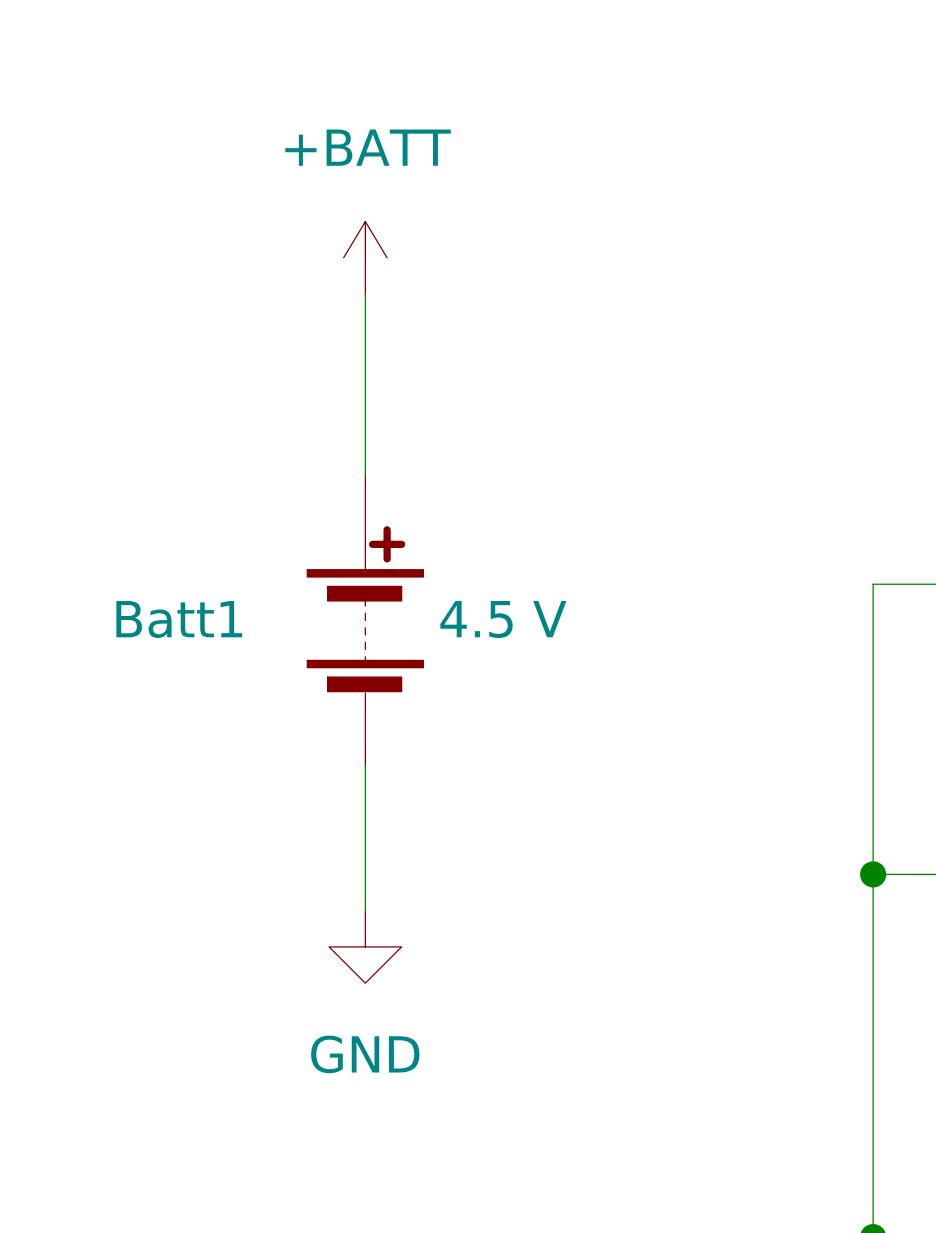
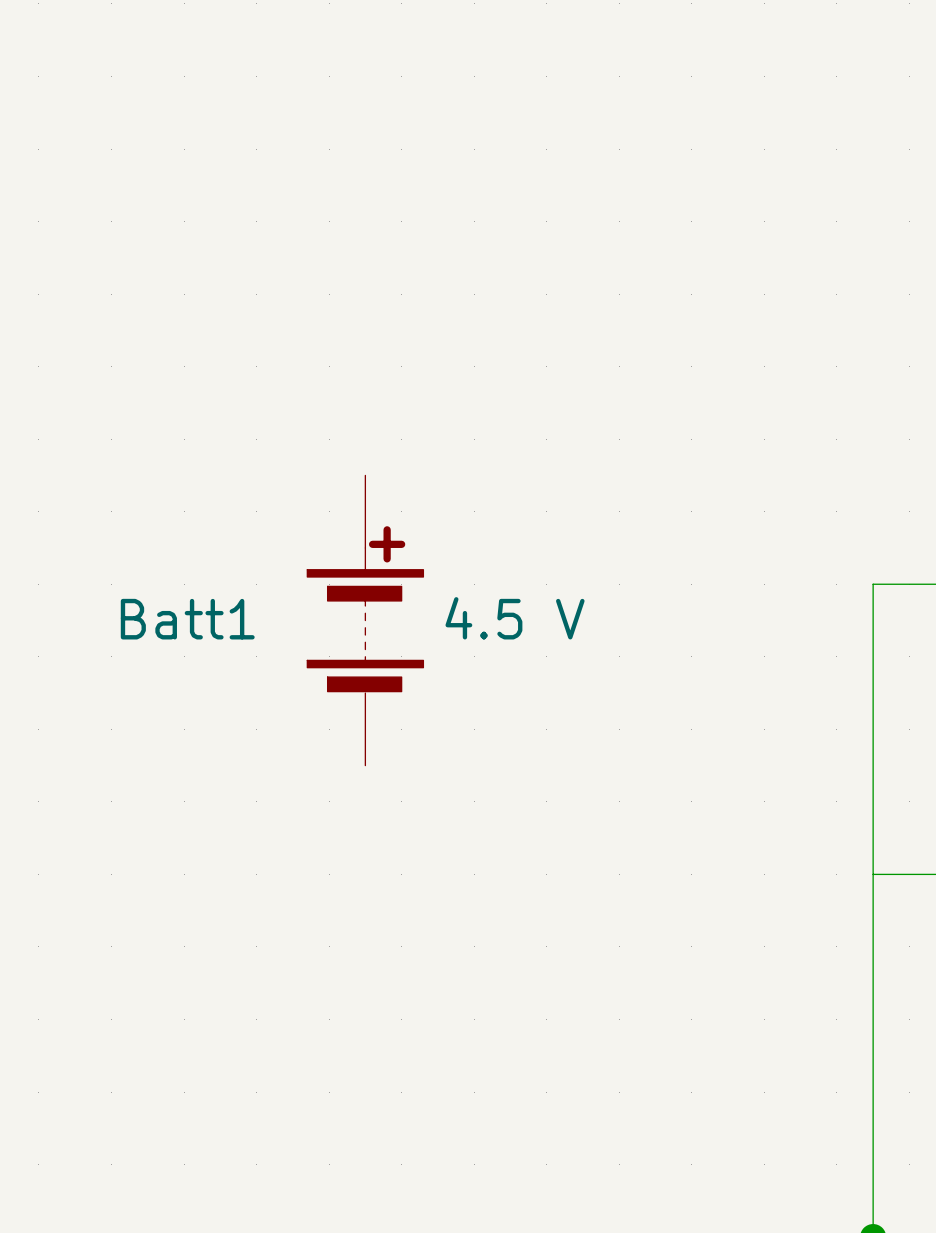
power symbol: +BATT (365, 257) -> none
wire: (365, 294) (365, 475) -> none
wire: (365, 765) (365, 910) -> none
junction: (873, 874) -> none
power symbol: GND (365, 946) -> none

